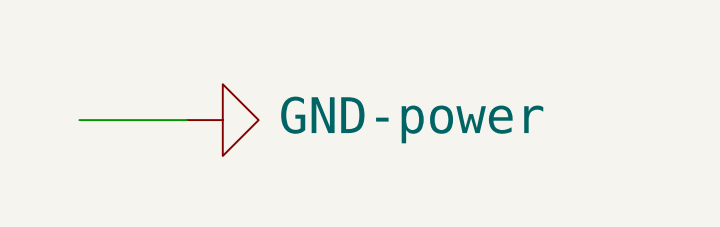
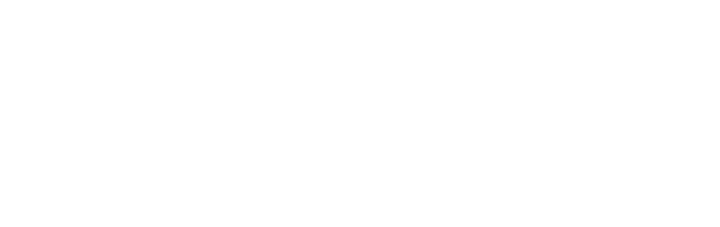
wire: (79, 120) (186, 120) -> none
power symbol: GND-power (222, 120) -> none

